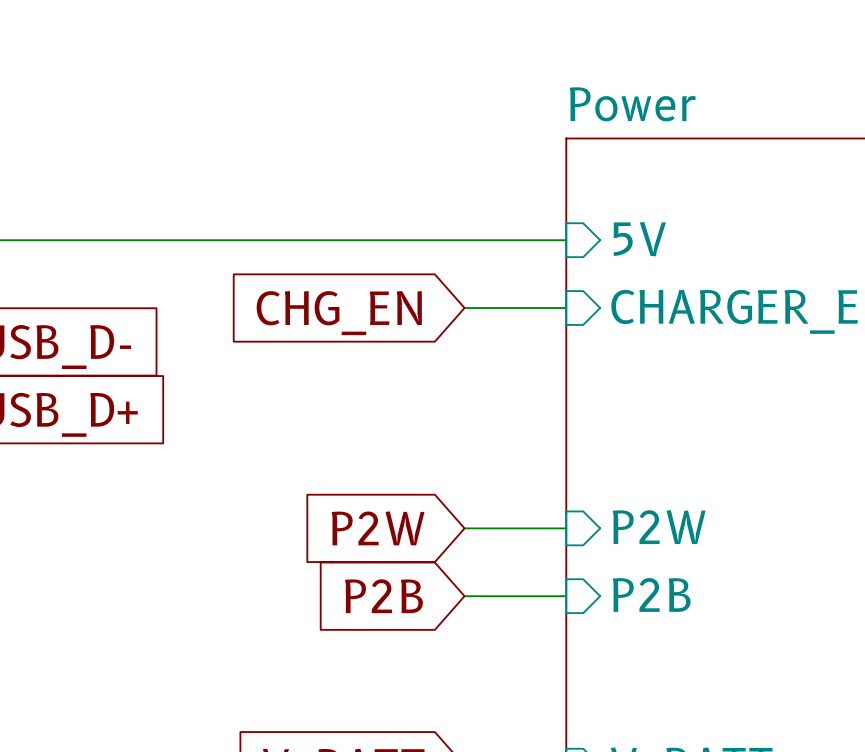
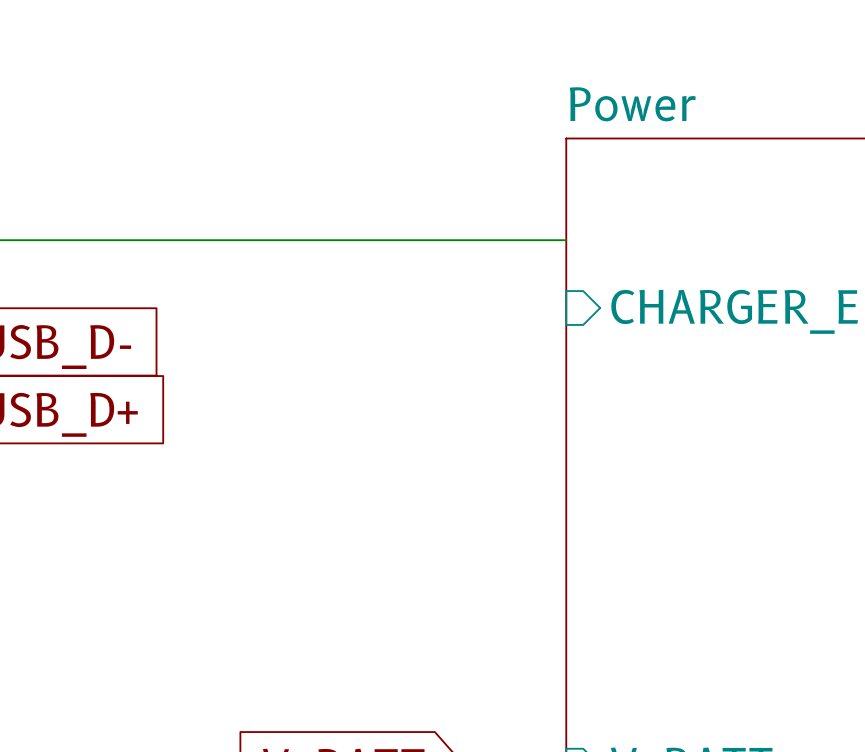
sheet pin: 5V (639, 239) -> none
wire: (464, 308) (566, 308) -> none
global label: CHG_EN (339, 313) -> none
sheet pin: P2W (659, 527) -> none
global label: P2W (378, 528) -> none
wire: (464, 528) (566, 528) -> none
sheet pin: P2B (651, 594) -> none
global label: P2B (383, 596) -> none
wire: (464, 596) (566, 596) -> none

